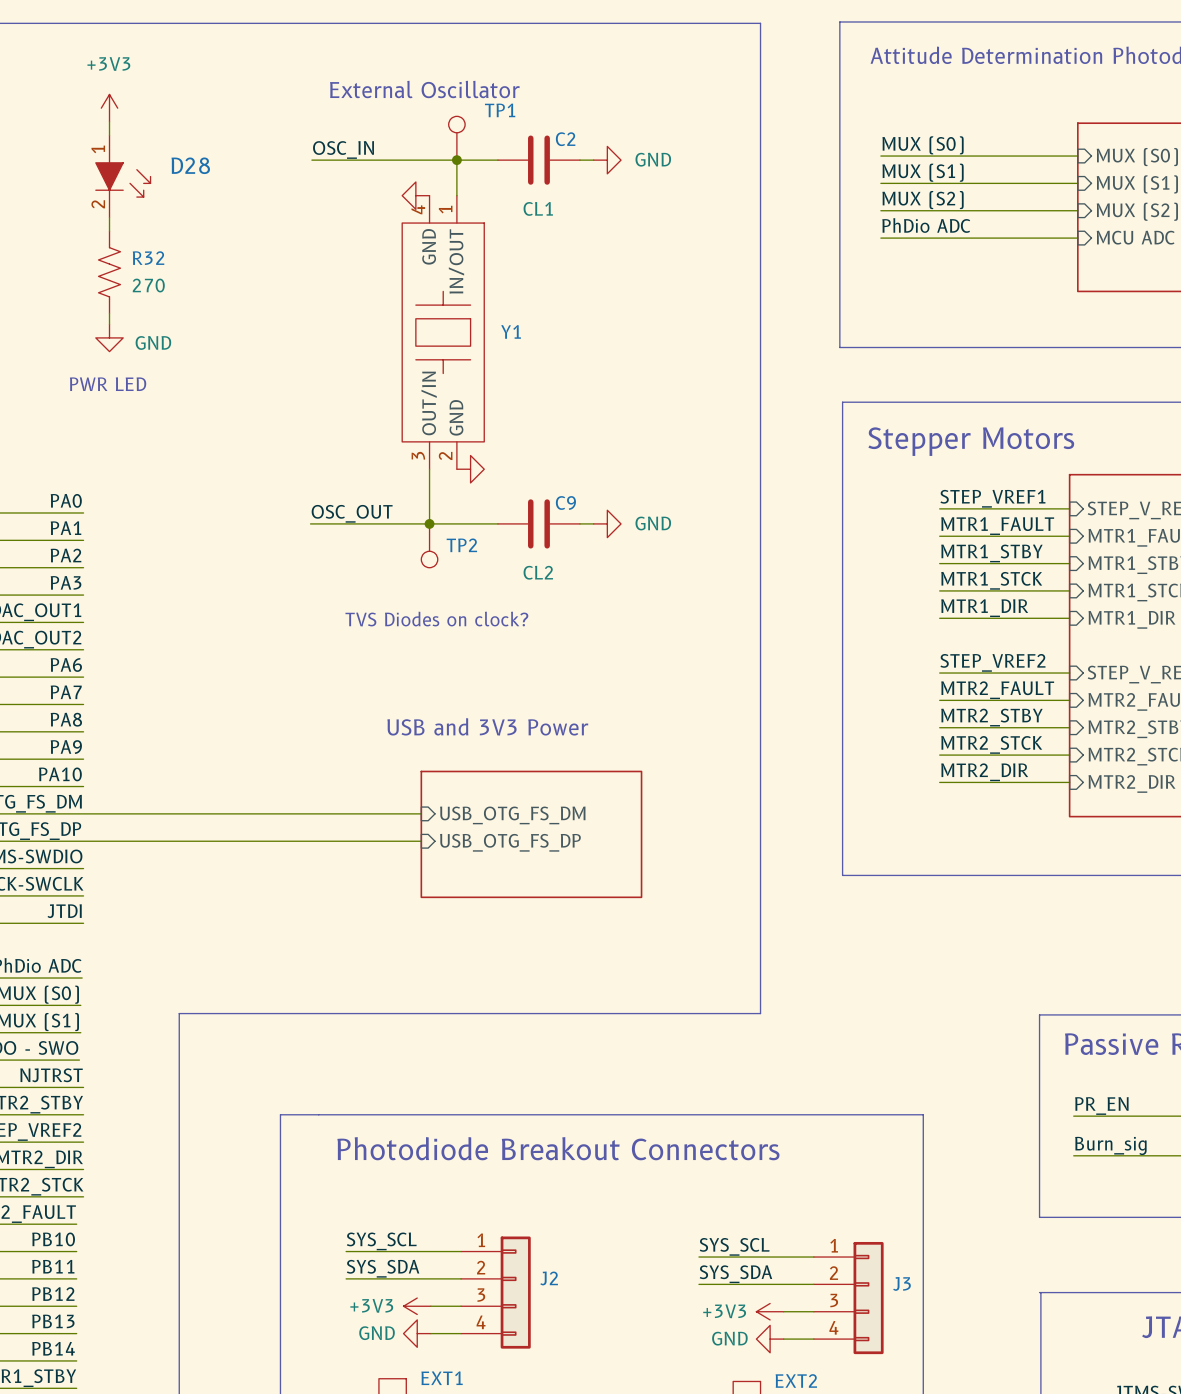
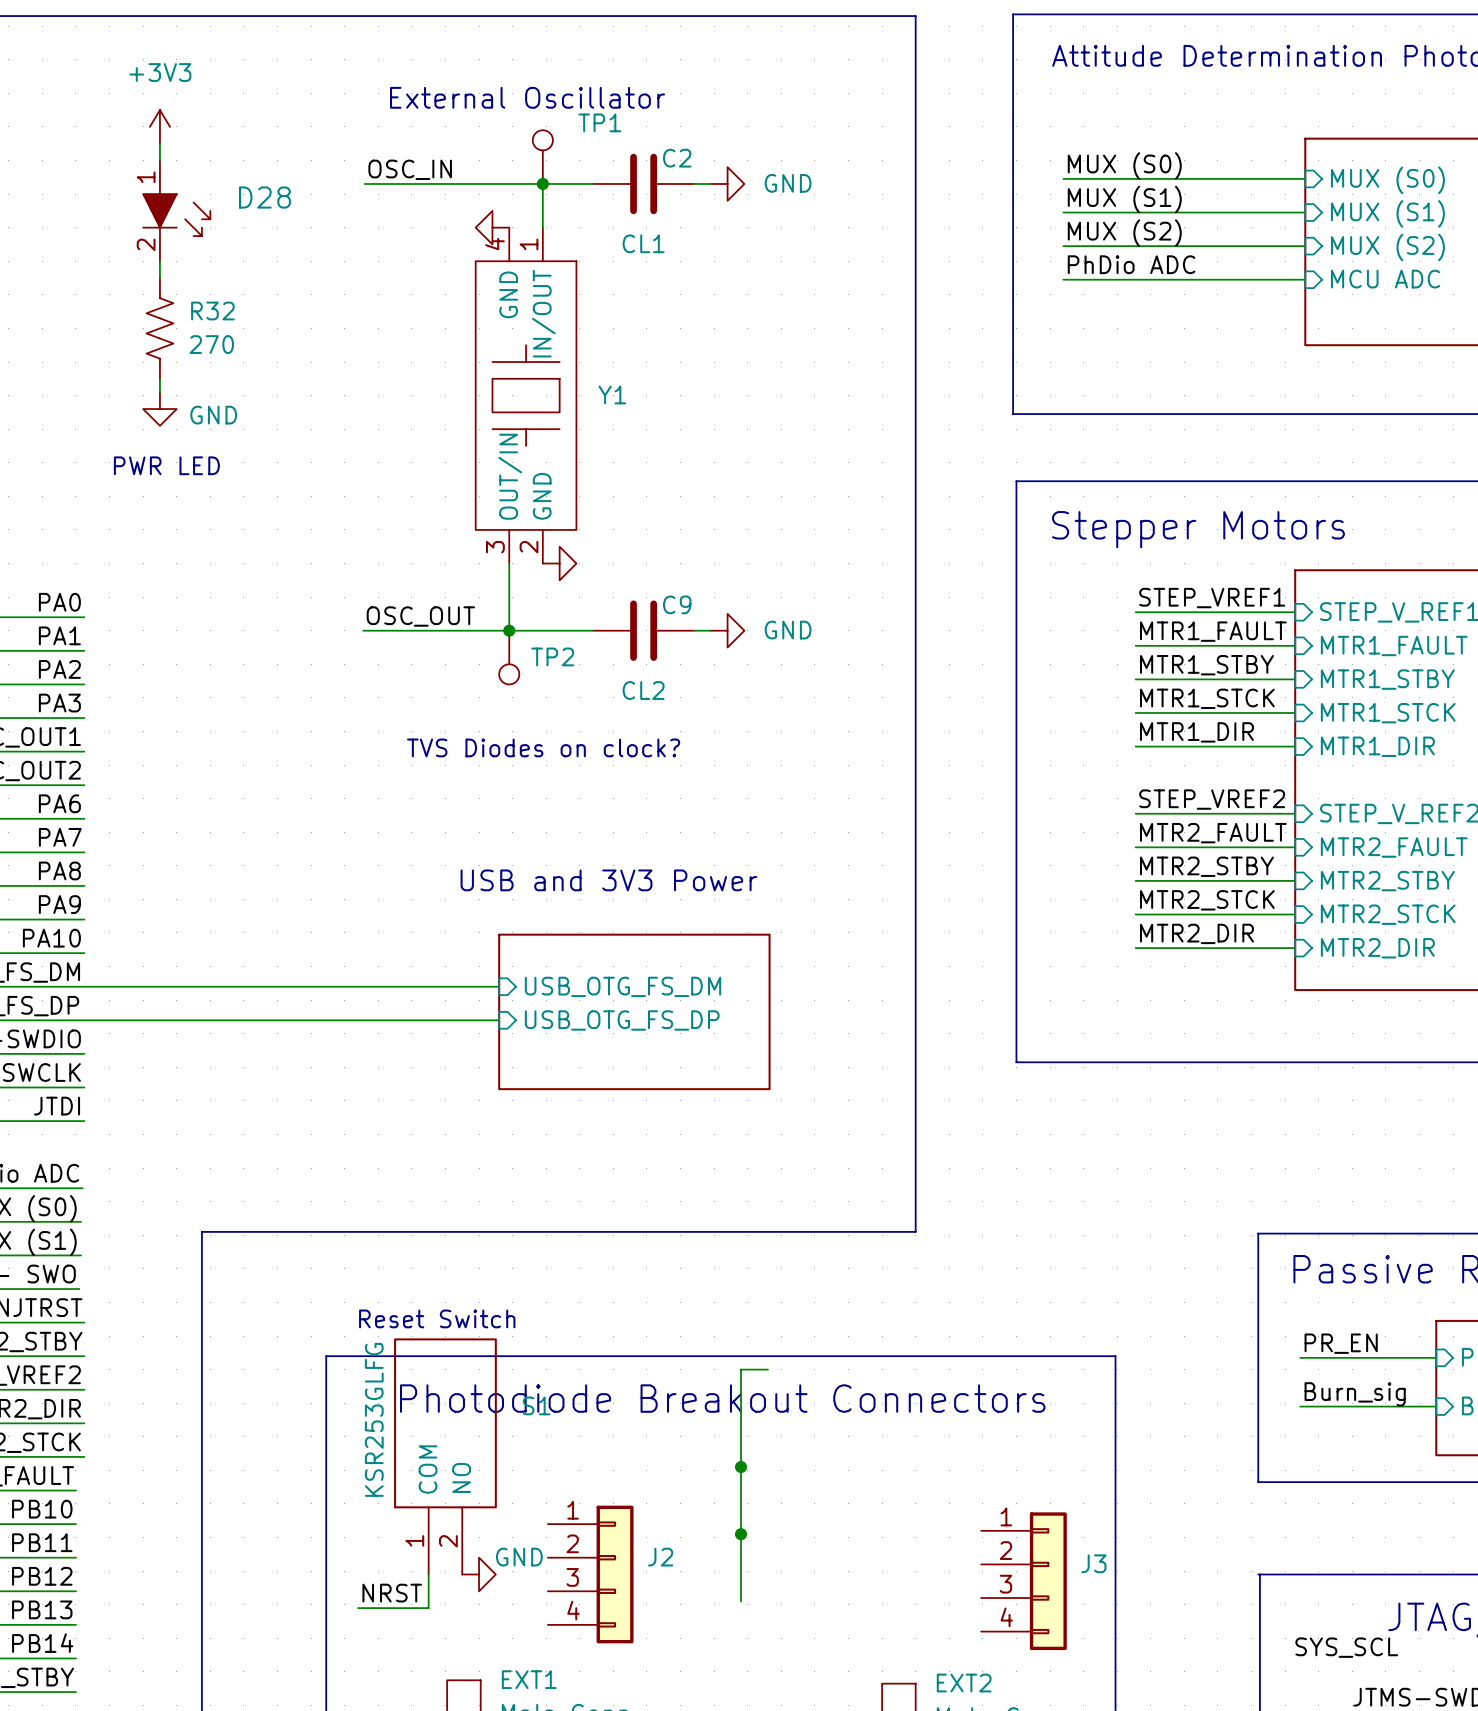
power symbol position: +3V3 (109, 108) -> +3V3 (159, 126)
wire: (109, 121) (109, 135) -> (159, 143) (159, 160)
D28 position: (123, 176) -> (176, 210)
wire: (109, 217) (109, 231) -> (159, 261) (159, 278)
R32 position: (109, 272) -> (159, 328)
wire: (109, 313) (109, 324) -> (159, 378) (159, 392)
power symbol position: GND (109, 337) -> GND (159, 409)
text position: PWR LED (108, 384) -> PWR LED (166, 465)
text: none -> Reset Switch (437, 1318)
wire: none -> (767, 1369) (741, 1369) (741, 1601)
S1: none -> KSR253GLFG (445, 1456)
junction: none -> (741, 1467)
label: SYS_SCL (381, 1241) -> none
label: SYS_SCL (734, 1246) -> none
wire: (346, 1251) (461, 1251) -> none
wire: (698, 1257) (813, 1257) -> none
junction: none -> (741, 1534)
label: SYS_SDA (383, 1268) -> none
label: SYS_SDA (735, 1274) -> none
wire: (346, 1278) (461, 1278) -> none
wire: (698, 1284) (813, 1284) -> none
wire: none -> (428, 1574) (428, 1608) (358, 1608)
power symbol: +3V3 (417, 1306) -> none
wire: (430, 1306) (461, 1306) -> none
label: none -> NRST (392, 1593)
power symbol: +3V3 (770, 1311) -> none
wire: (783, 1311) (813, 1311) -> none
power symbol rotation: 0° (417, 1333) -> 180° (479, 1574)
power symbol position: GND (417, 1333) -> GND (479, 1574)
wire: (430, 1333) (461, 1333) -> none
power symbol: GND (770, 1339) -> none
wire: (783, 1339) (813, 1339) -> none
label: none -> SYS_SCL (1346, 1647)

